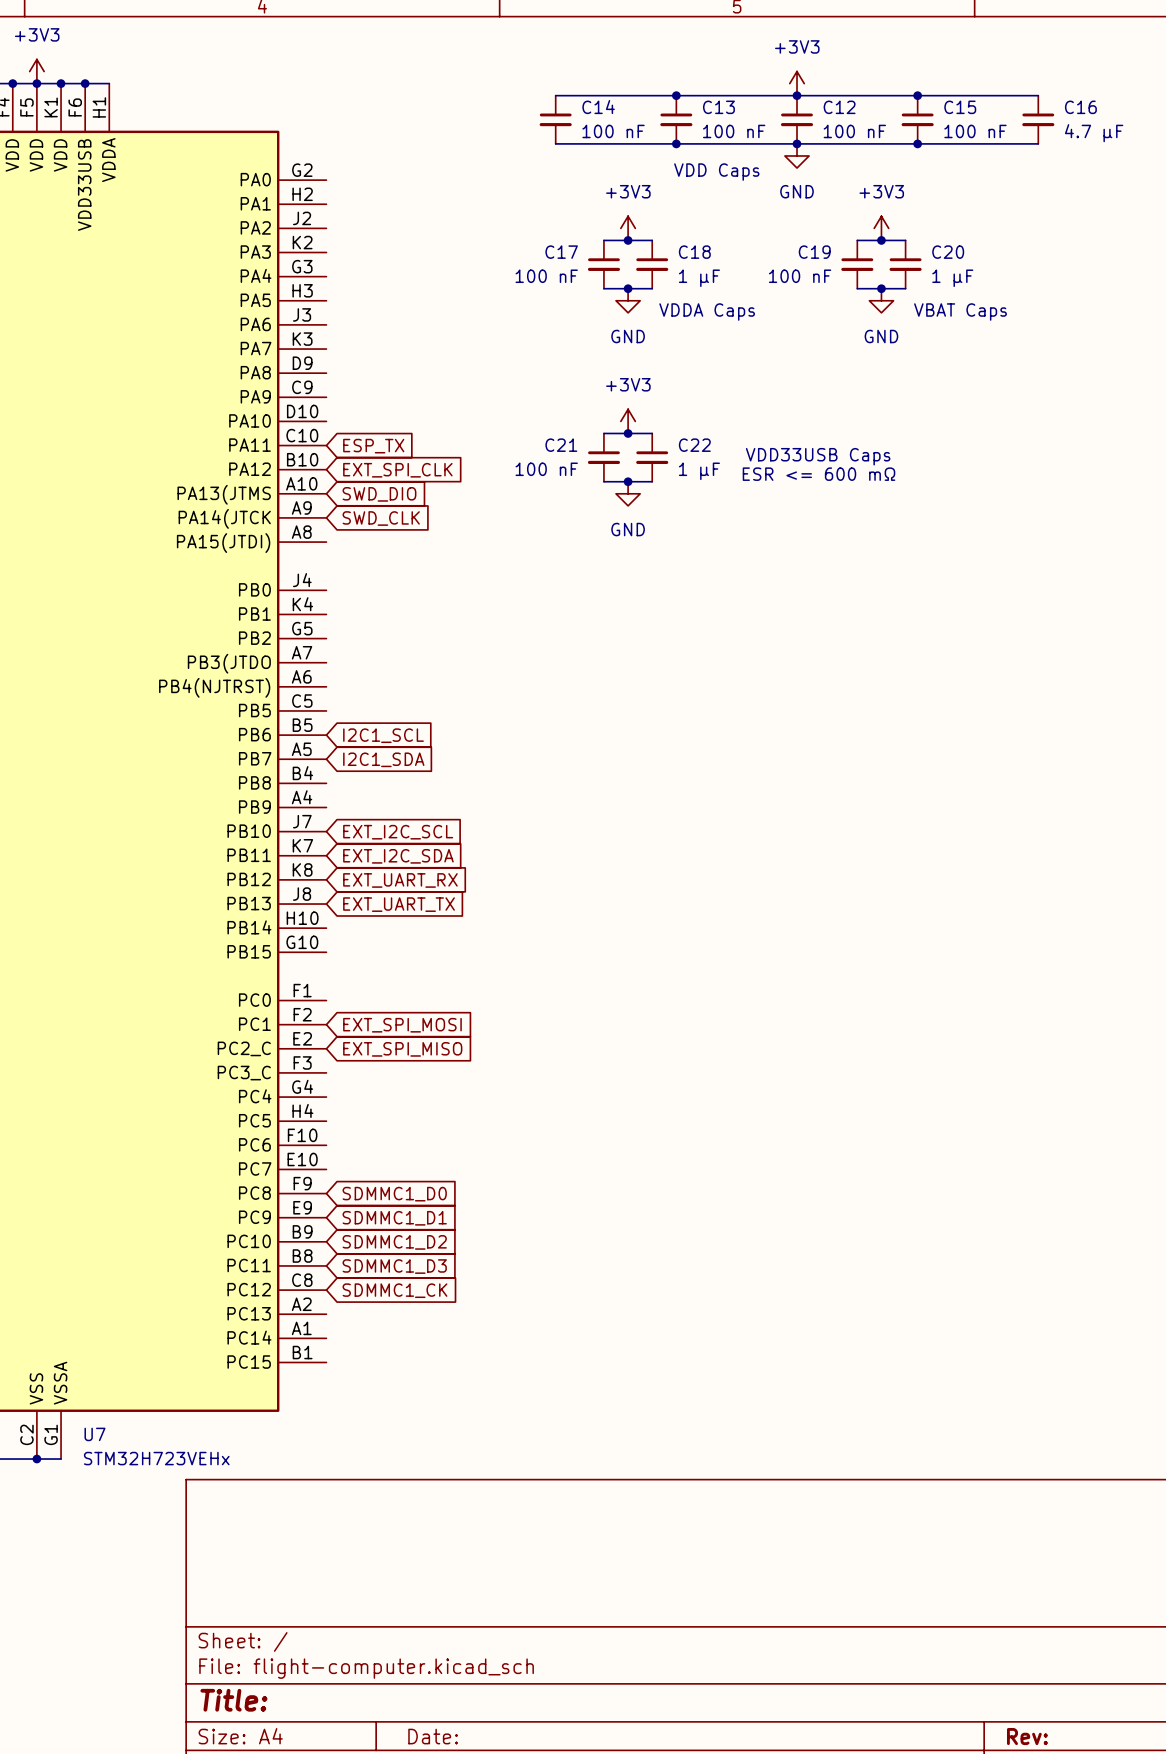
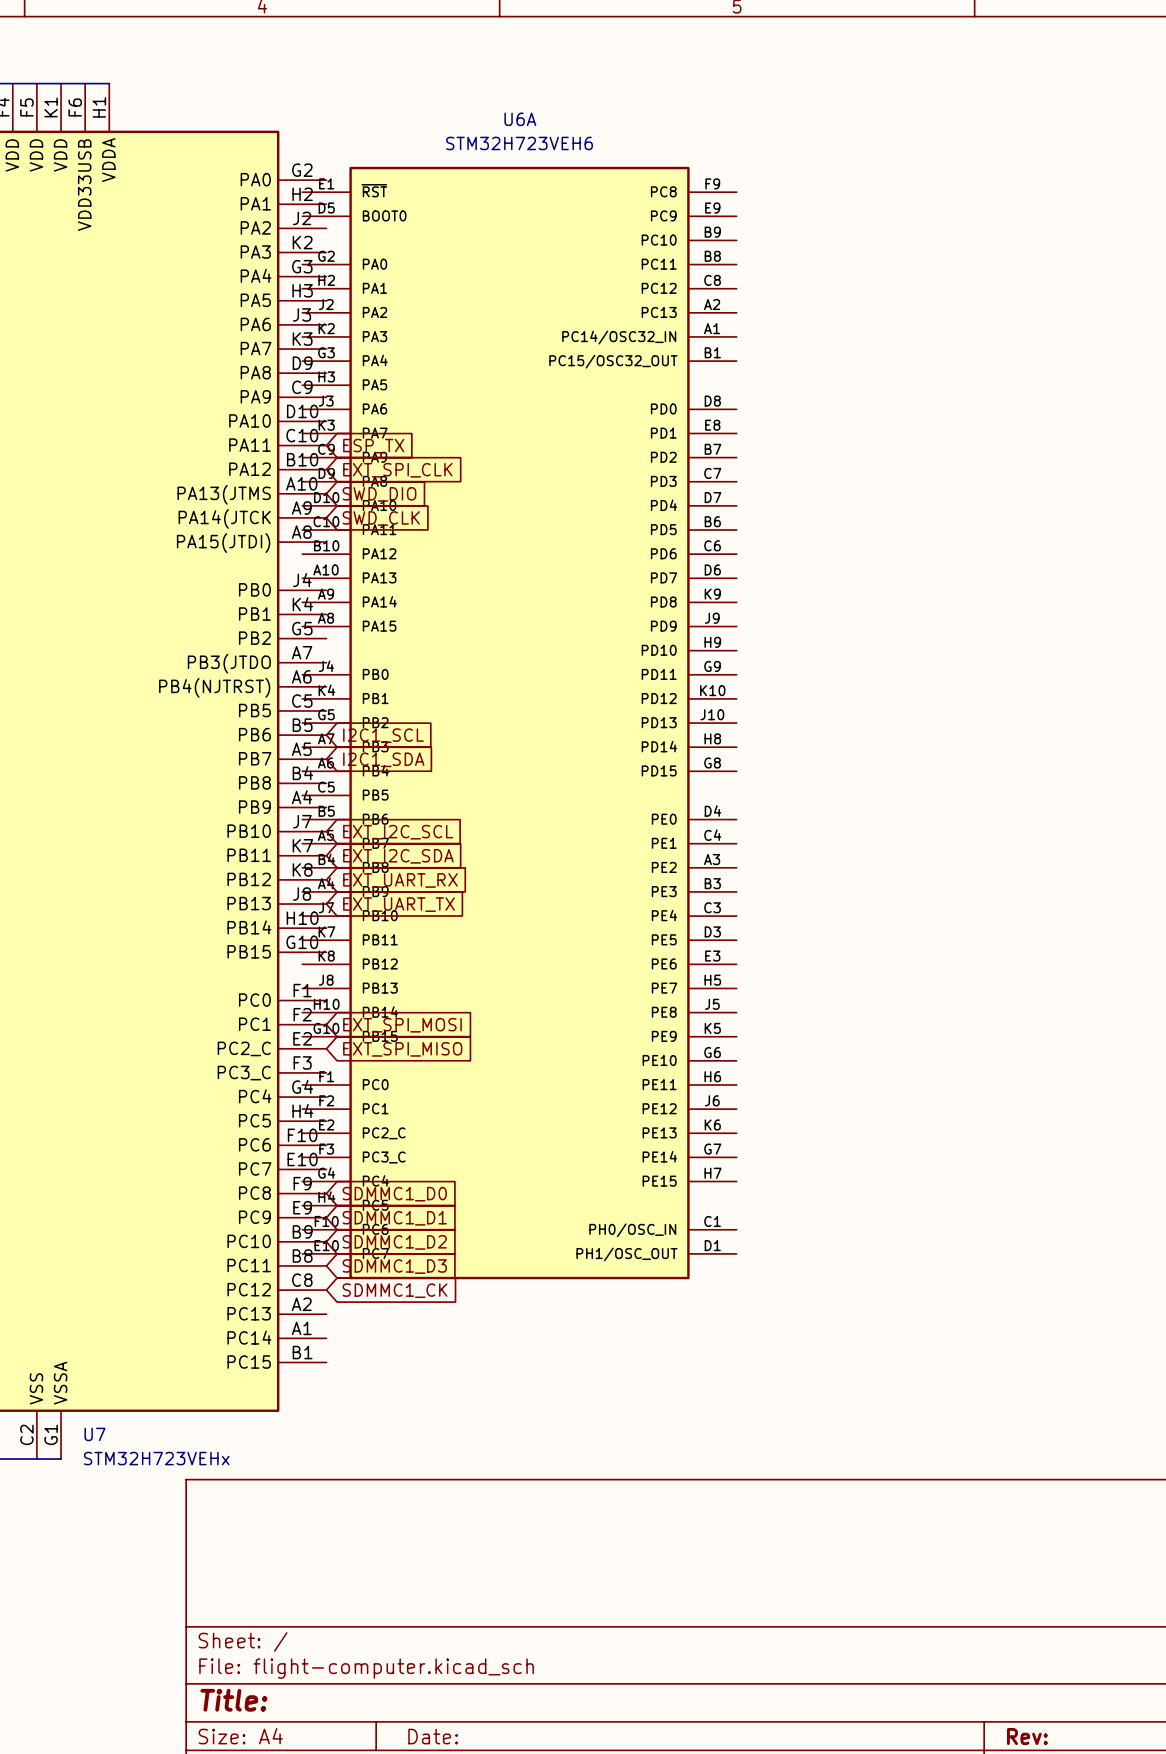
power symbol: +3V3 (36, 71) -> none
junction: (12, 83) -> none
junction: (36, 83) -> none
junction: (61, 83) -> none
junction: (85, 83) -> none
power symbol: +3V3 (797, 83) -> none
wire: (555, 95) (1038, 95) -> none
junction: (676, 95) -> none
junction: (797, 95) -> none
junction: (917, 95) -> none
C14: 100 nF (555, 119) -> none
C13: 100 nF (676, 119) -> none
C12: 100 nF (797, 119) -> none
C15: 100 nF (917, 119) -> none
C16: 4.7 µF (1038, 119) -> none
wire: (555, 143) (1038, 143) -> none
junction: (676, 143) -> none
junction: (797, 143) -> none
junction: (917, 143) -> none
power symbol: GND (797, 155) -> none
text: VDD Caps (716, 172) -> none
power symbol: +3V3 (628, 228) -> none
power symbol: +3V3 (881, 228) -> none
junction: (628, 240) -> none
wire: (857, 240) (905, 240) -> none
junction: (881, 240) -> none
C17: 100 nF (603, 264) -> none
C18: 1 µF (652, 264) -> none
C19: 100 nF (857, 264) -> none
C20: 1 µF (905, 264) -> none
junction: (628, 288) -> none
wire: (857, 288) (905, 288) -> none
junction: (881, 288) -> none
power symbol: GND (628, 300) -> none
power symbol: GND (881, 300) -> none
text: VDDA Caps (707, 312) -> none
text: VBAT Caps (960, 312) -> none
power symbol: +3V3 (628, 421) -> none
junction: (628, 433) -> none
text: VDD33USB Caps (818, 456) -> none
C21: 100 nF (603, 457) -> none
C22: 1 µF (652, 457) -> none
text: ESR <= 600 mΩ (819, 474) -> none
junction: (628, 481) -> none
power symbol: GND (628, 493) -> none
U6A: none -> STM32H723VEH6 (519, 723)
junction: (36, 1459) -> none

